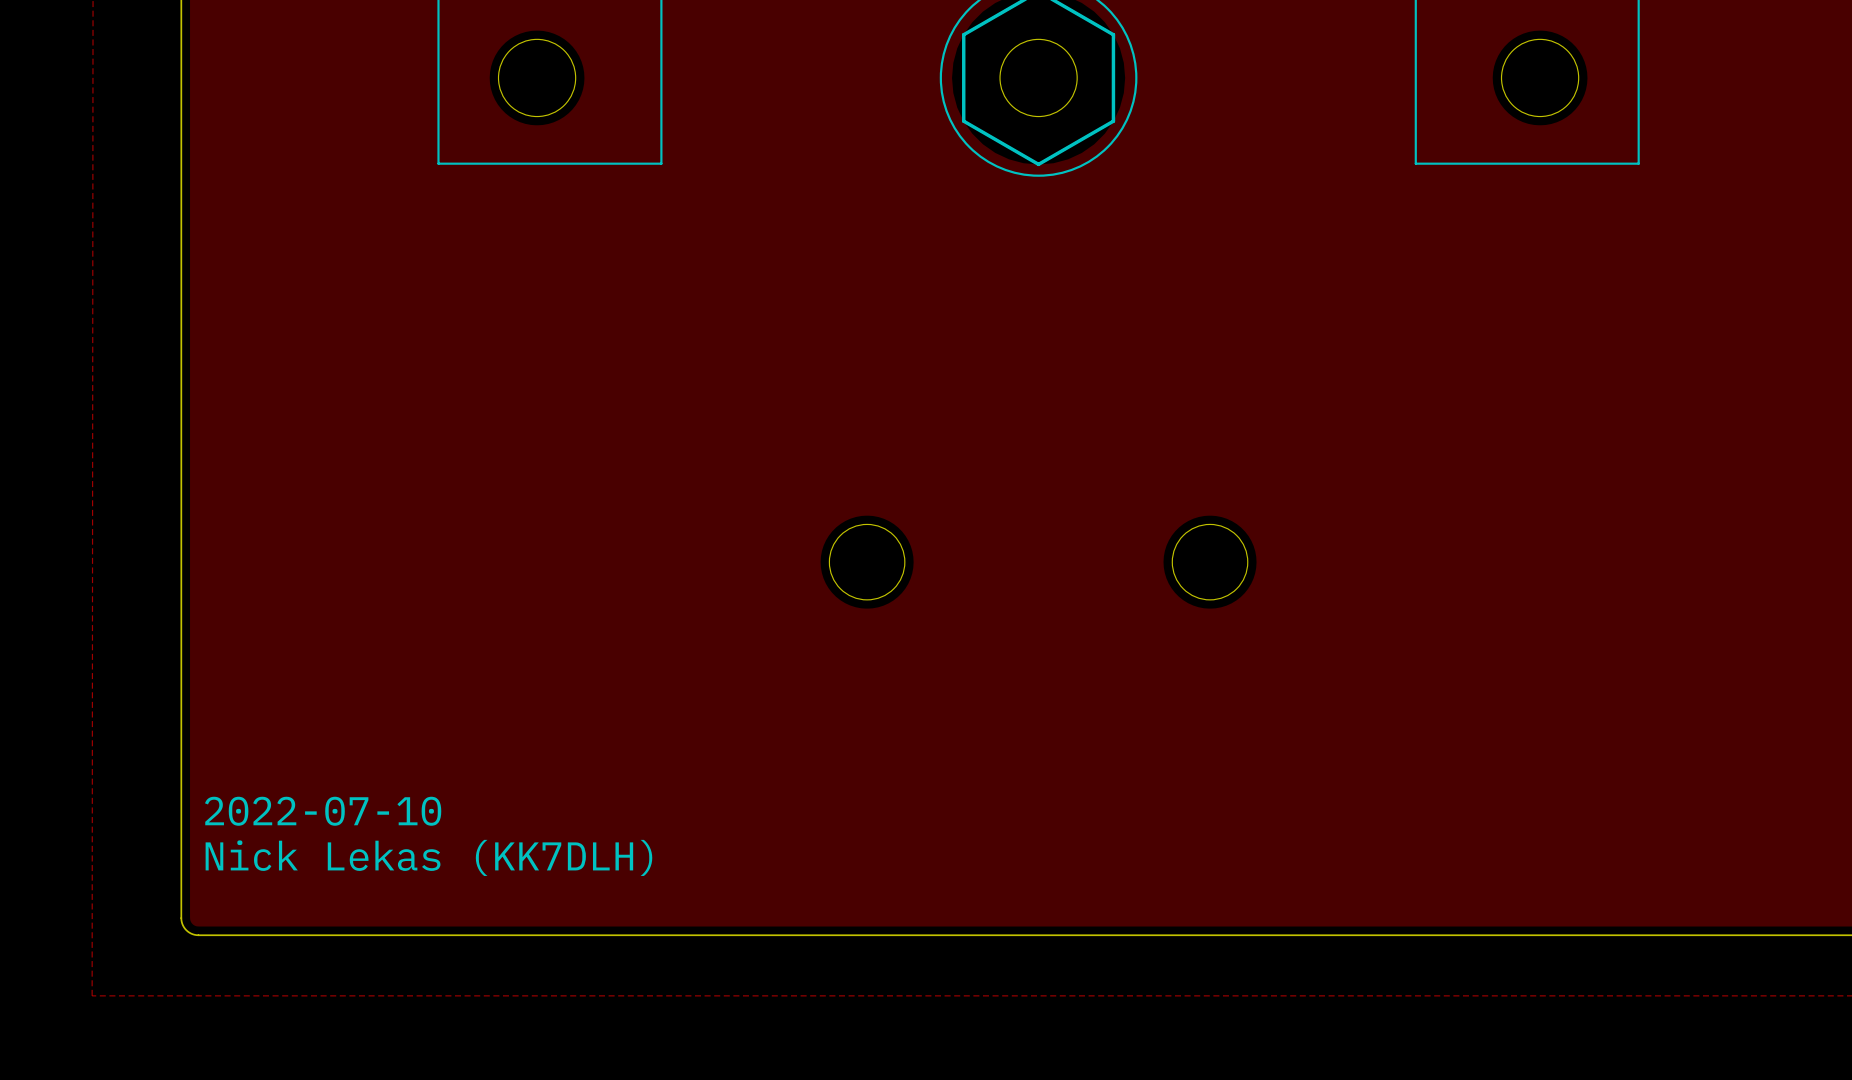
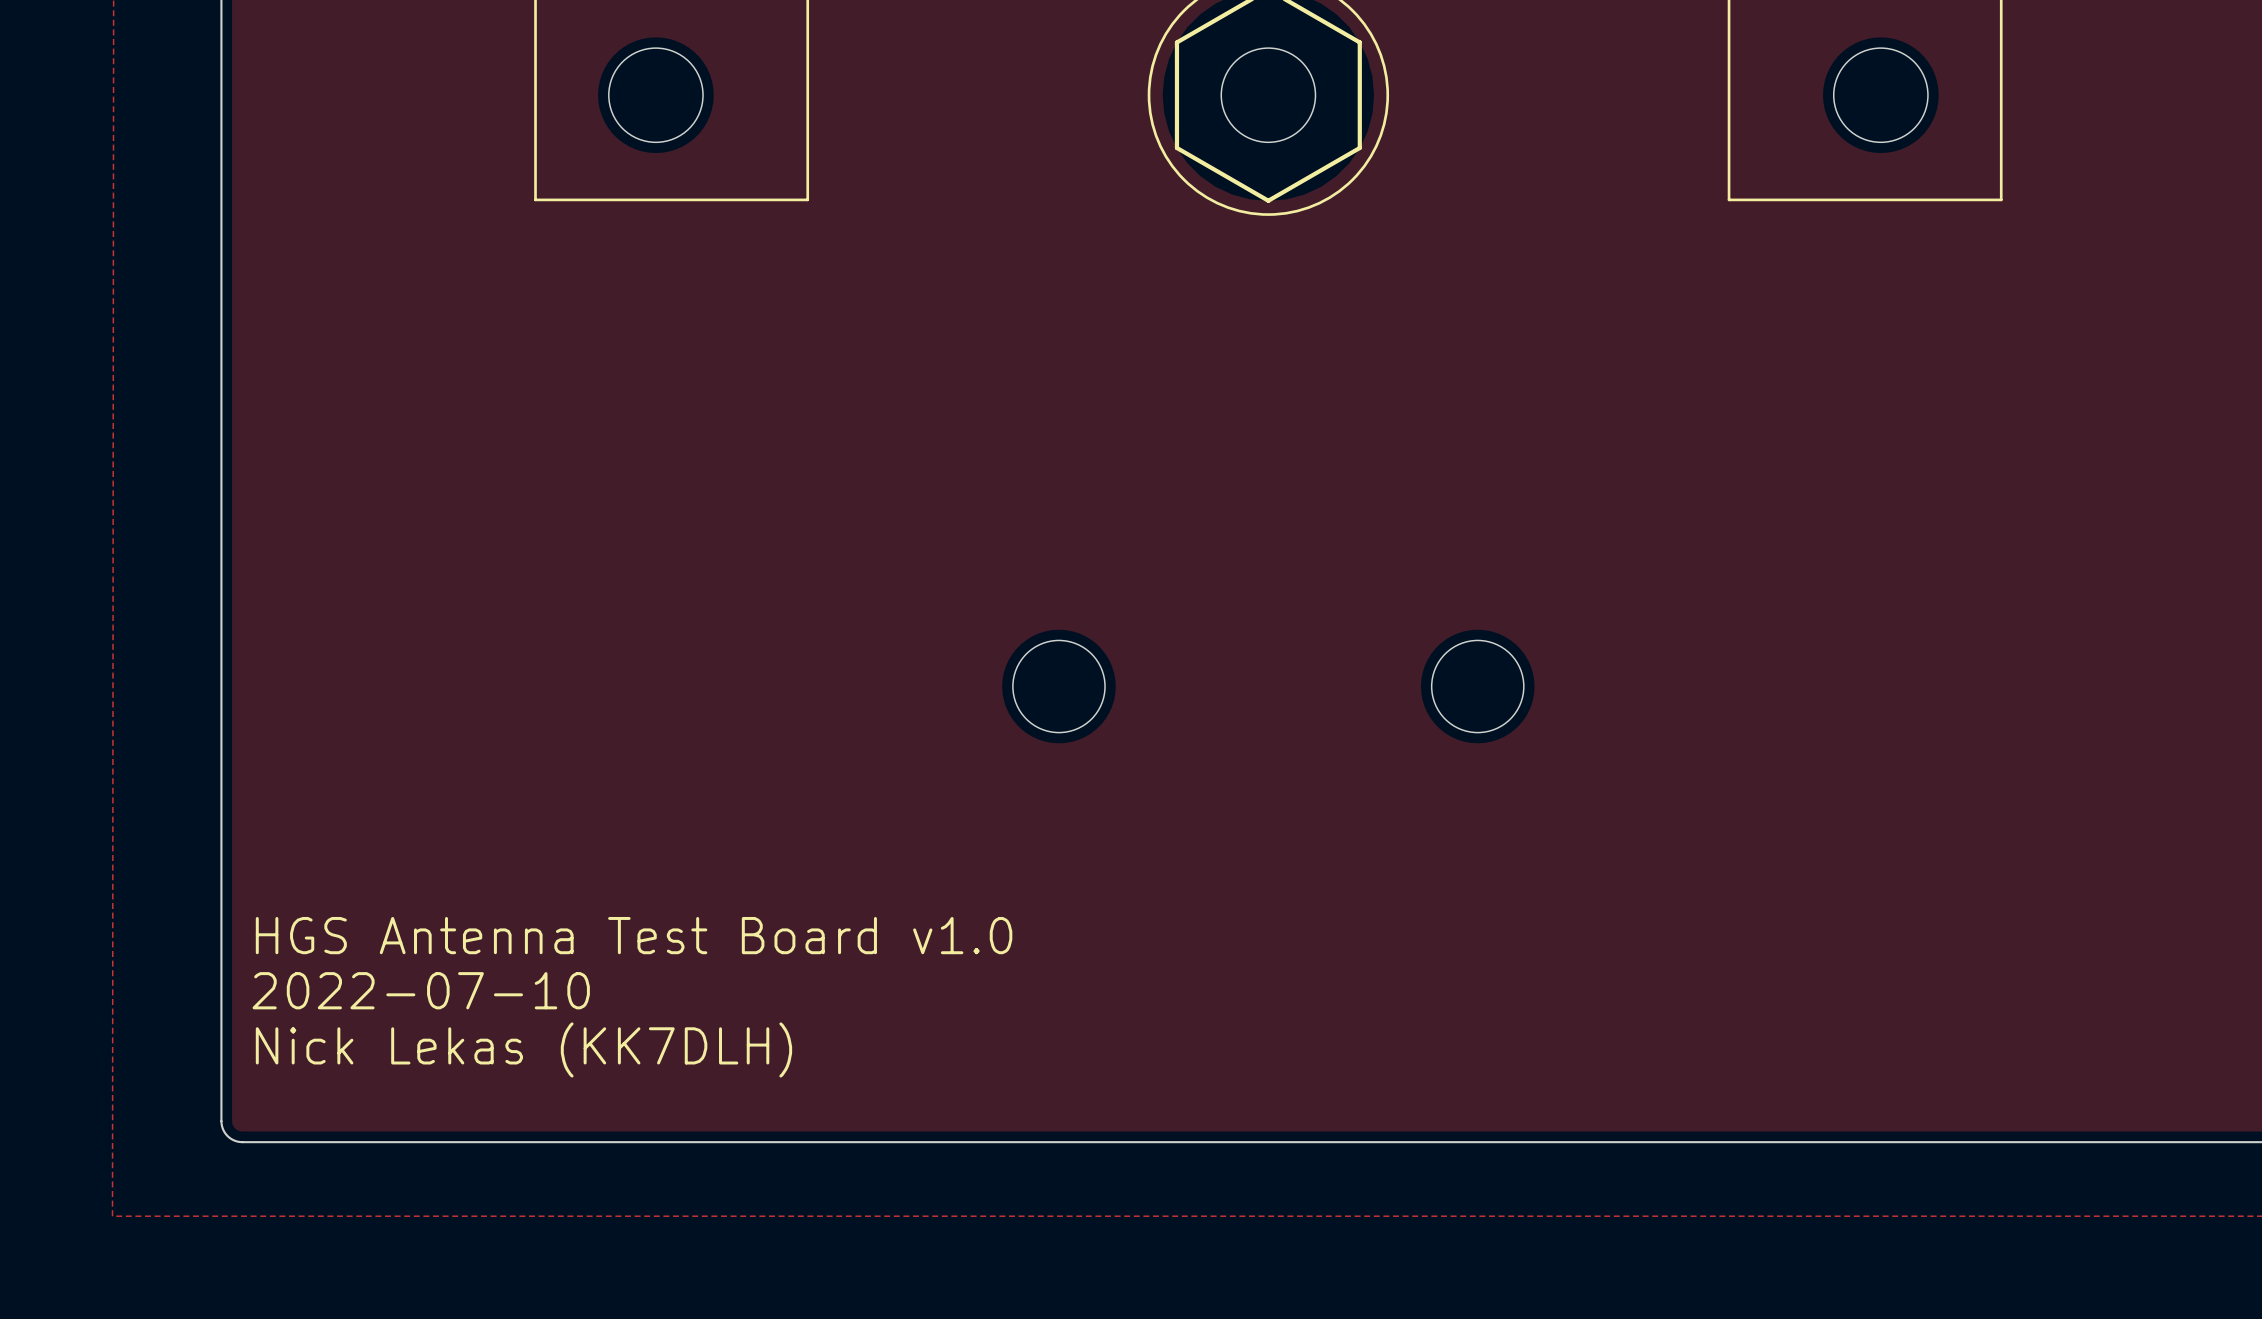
text: none -> HGS Antenna Test Board v1.0 (634, 935)

